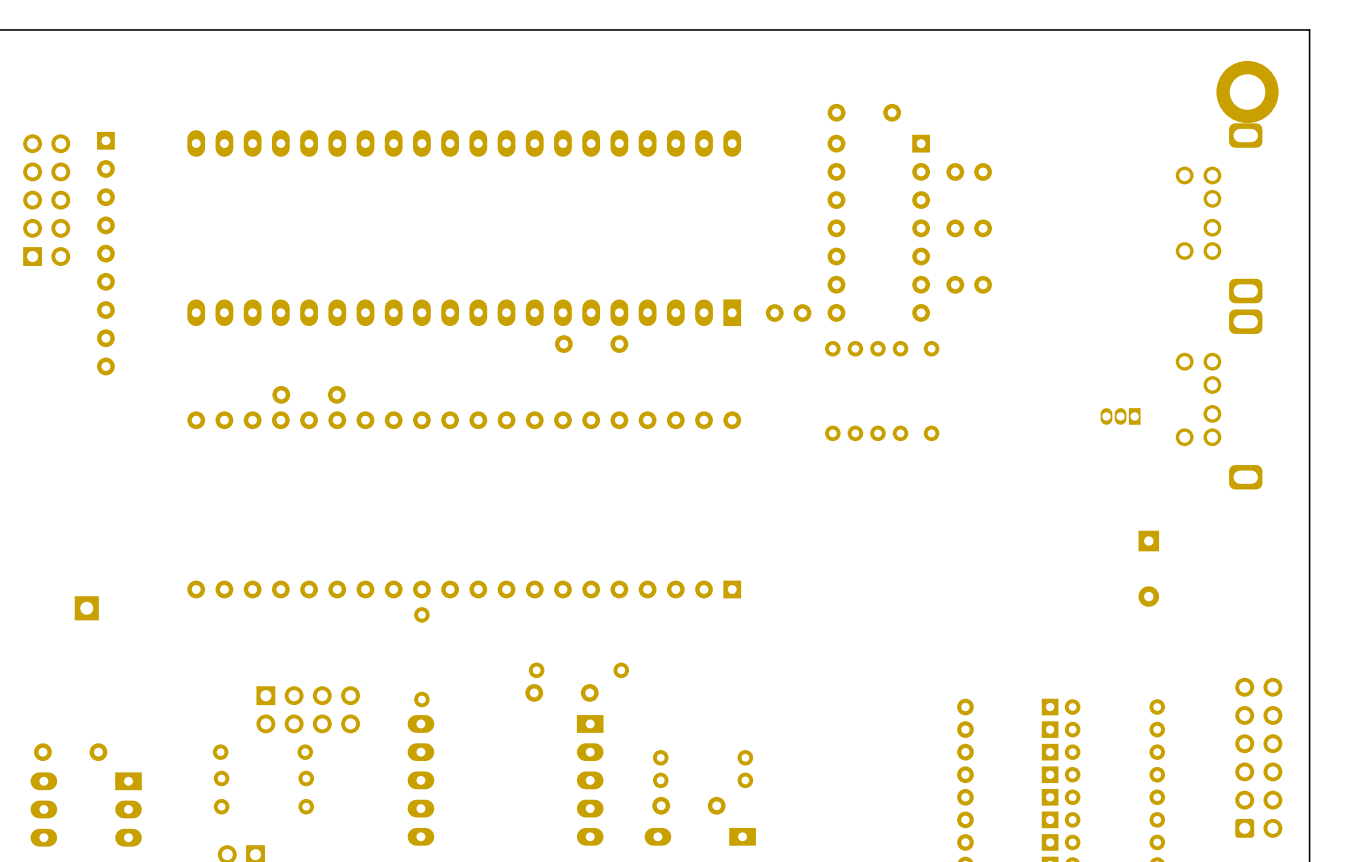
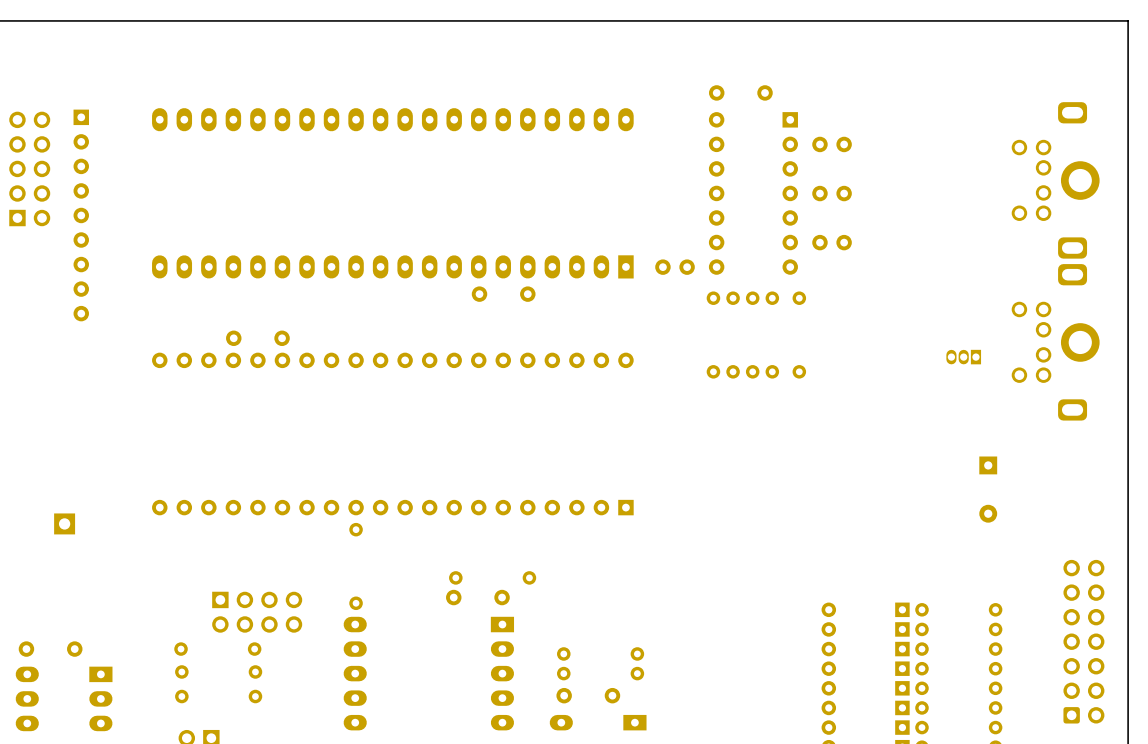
part: (1247, 92) -> none
part footprint: [1175, 123, 1263, 304] -> [1011, 102, 1100, 259]
part footprint: [1175, 309, 1263, 490] -> [1011, 264, 1100, 421]
part: none -> (1083, 641)

